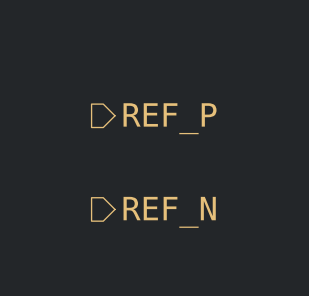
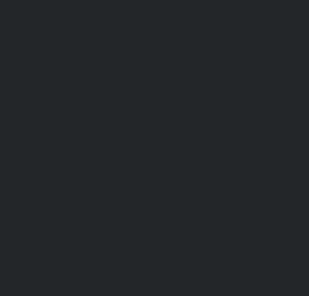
hierarchical label: REF_P (170, 118) -> none
hierarchical label: REF_N (169, 212) -> none

